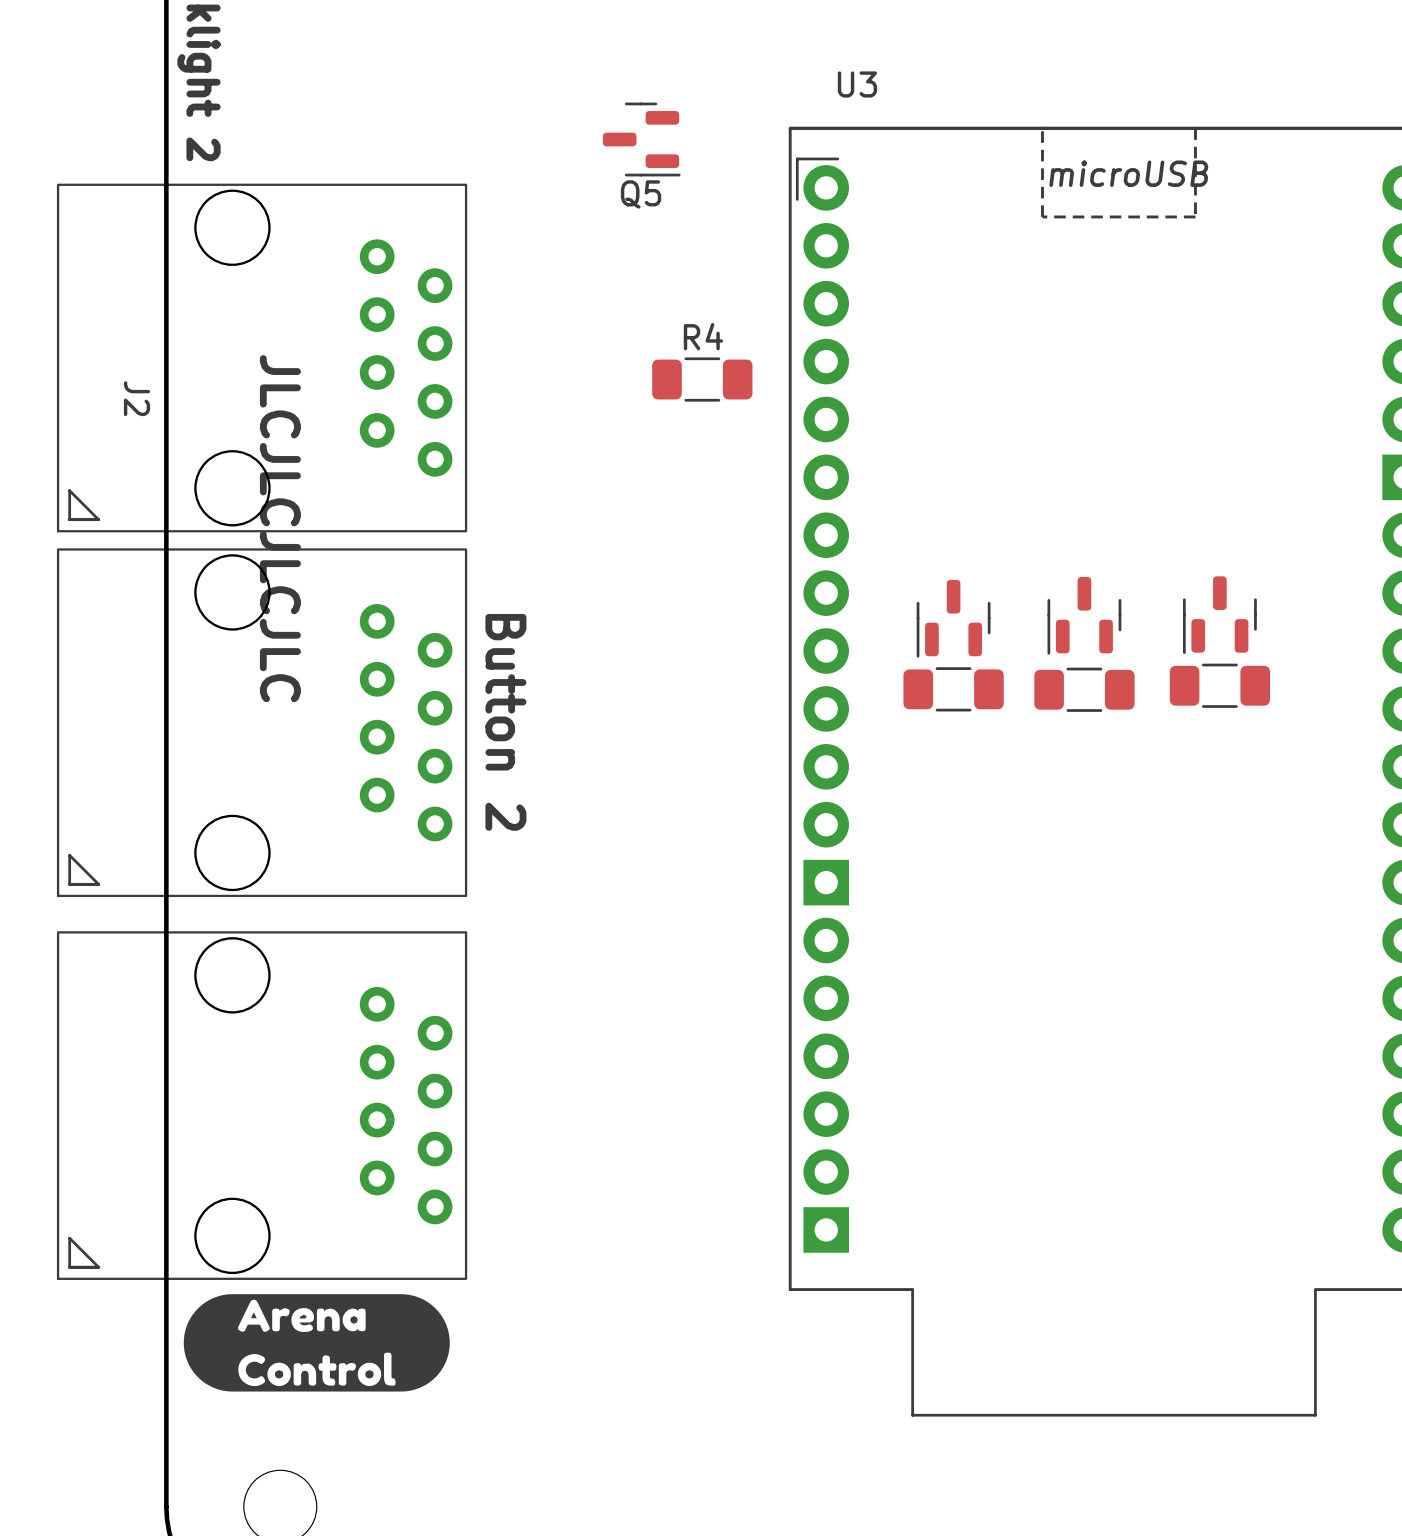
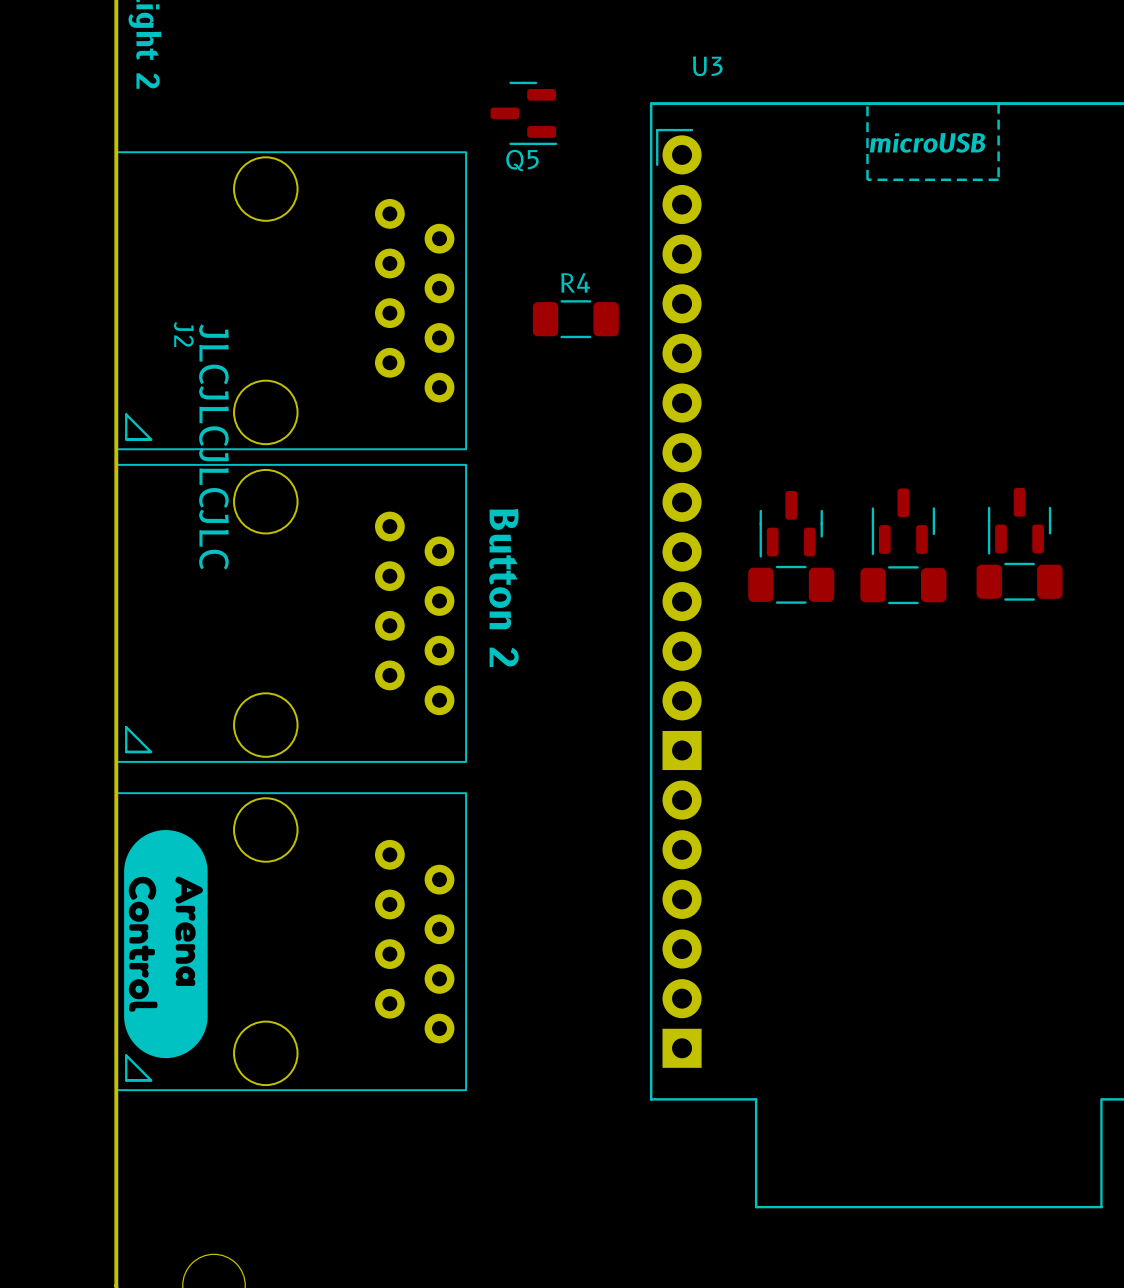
J2 position: (262, 358) -> (291, 300)
part position: (262, 722) -> (291, 613)
text position: Button 2 (505, 722) -> Button 2 (503, 588)
drawing: none -> [124, 830, 208, 1059]
part position: (262, 1105) -> (291, 941)
drawing: [183, 1294, 450, 1392] -> none

